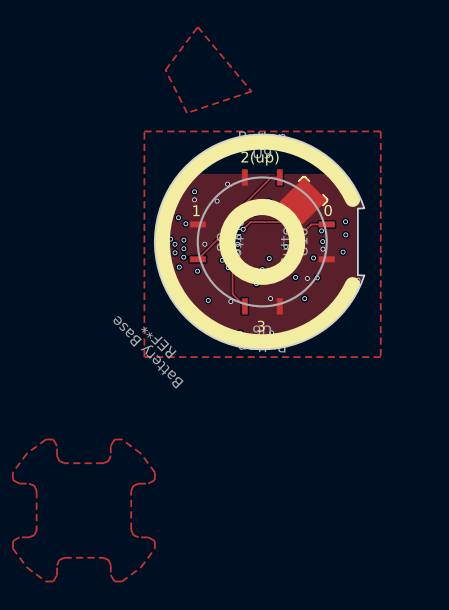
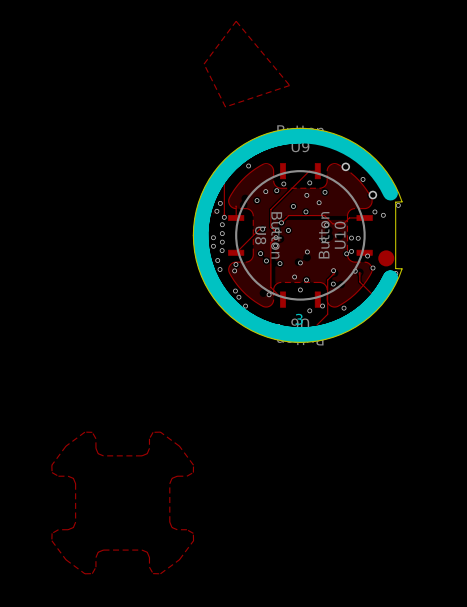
zone outline: (144, 131) (380, 131) (380, 357) (144, 357) (144, 131) -> none
text: 2(up) (259, 158) -> none
via: none -> (248, 166)
zone outline: none -> (260, 165) (266, 163) (271, 165) (274, 183) (281, 188) (322, 187) (326, 183) (329, 165) (334, 163) (340, 165)
zone outline: none -> (259, 165) (250, 172)
via: none -> (345, 166)
track: none -> (230, 171) (224, 177) (224, 217)
zone outline: none -> (250, 172) (245, 176)
zone outline: none -> (350, 172) (355, 176)
zone outline: none -> (245, 176) (241, 180)
zone outline: none -> (355, 176) (359, 180)
via: (227, 184) -> none
via: none -> (363, 179)
zone outline: none -> (241, 180) (237, 185)
zone outline: none -> (359, 180) (363, 185)
via: none -> (309, 182)
via: none -> (283, 183)
via: (194, 191) -> none
zone outline: none -> (237, 185) (231, 194)
zone outline: none -> (363, 185) (369, 194)
via: none -> (276, 190)
via: none -> (265, 191)
via: none -> (325, 192)
via: (194, 199) -> none
zone outline: none -> (230, 195) (228, 201) (230, 206) (248, 209) (253, 216) (252, 257) (248, 261) (230, 264) (228, 269) (230, 275)
via: (217, 201) -> none
zone outline: none -> (369, 195) (372, 201) (369, 206) (352, 209) (347, 216) (347, 257) (352, 261) (369, 264) (372, 269) (369, 275)
via: none -> (372, 195)
via: none -> (257, 200)
via: none -> (220, 203)
text: 1 (196, 210) -> none
text: 0 (328, 210) -> none
via: none -> (398, 205)
track: none -> (235, 206) (236, 217)
via: none -> (305, 211)
via: none -> (374, 211)
REF**: Battery Base (273, 230) -> none
via: (321, 230) -> none
via: none -> (222, 224)
via: (345, 234) -> none
via: none -> (288, 230)
via: (170, 239) -> none
via: (322, 241) -> none
via: (204, 244) -> none
via: none -> (351, 238)
via: none -> (358, 238)
via: (322, 249) -> none
via: (343, 252) -> none
via: none -> (346, 253)
via: none -> (367, 256)
part: none -> (386, 258)
via: none -> (373, 268)
via: none -> (220, 269)
via: none -> (234, 270)
via: (307, 278) -> none
track: none -> (359, 272) (359, 281) (372, 294)
track: none -> (334, 273) (327, 280) (327, 314) (316, 325)
zone outline: none -> (231, 275) (237, 285)
zone outline: none -> (369, 275) (363, 285)
via: none -> (306, 280)
via: none -> (333, 284)
zone outline: none -> (237, 285) (241, 289)
zone outline: none -> (363, 285) (359, 289)
zone outline: none -> (241, 290) (245, 294)
via: none -> (300, 289)
zone outline: none -> (359, 290) (355, 294)
via: none -> (235, 291)
via: (270, 298) -> none
via: (304, 298) -> none
via: (208, 300) -> none
zone outline: none -> (245, 294) (250, 298)
zone outline: none -> (355, 294) (350, 298)
via: none -> (238, 297)
zone outline: none -> (250, 298) (259, 304)
zone outline: none -> (350, 298) (340, 304)
zone outline: none -> (260, 304) (266, 307) (271, 304) (274, 287) (281, 282) (322, 282) (326, 287) (329, 304) (334, 307) (340, 304)
via: none -> (245, 306)
via: none -> (322, 306)
via: none -> (344, 308)
via: none -> (309, 310)
via: (271, 332) -> none

